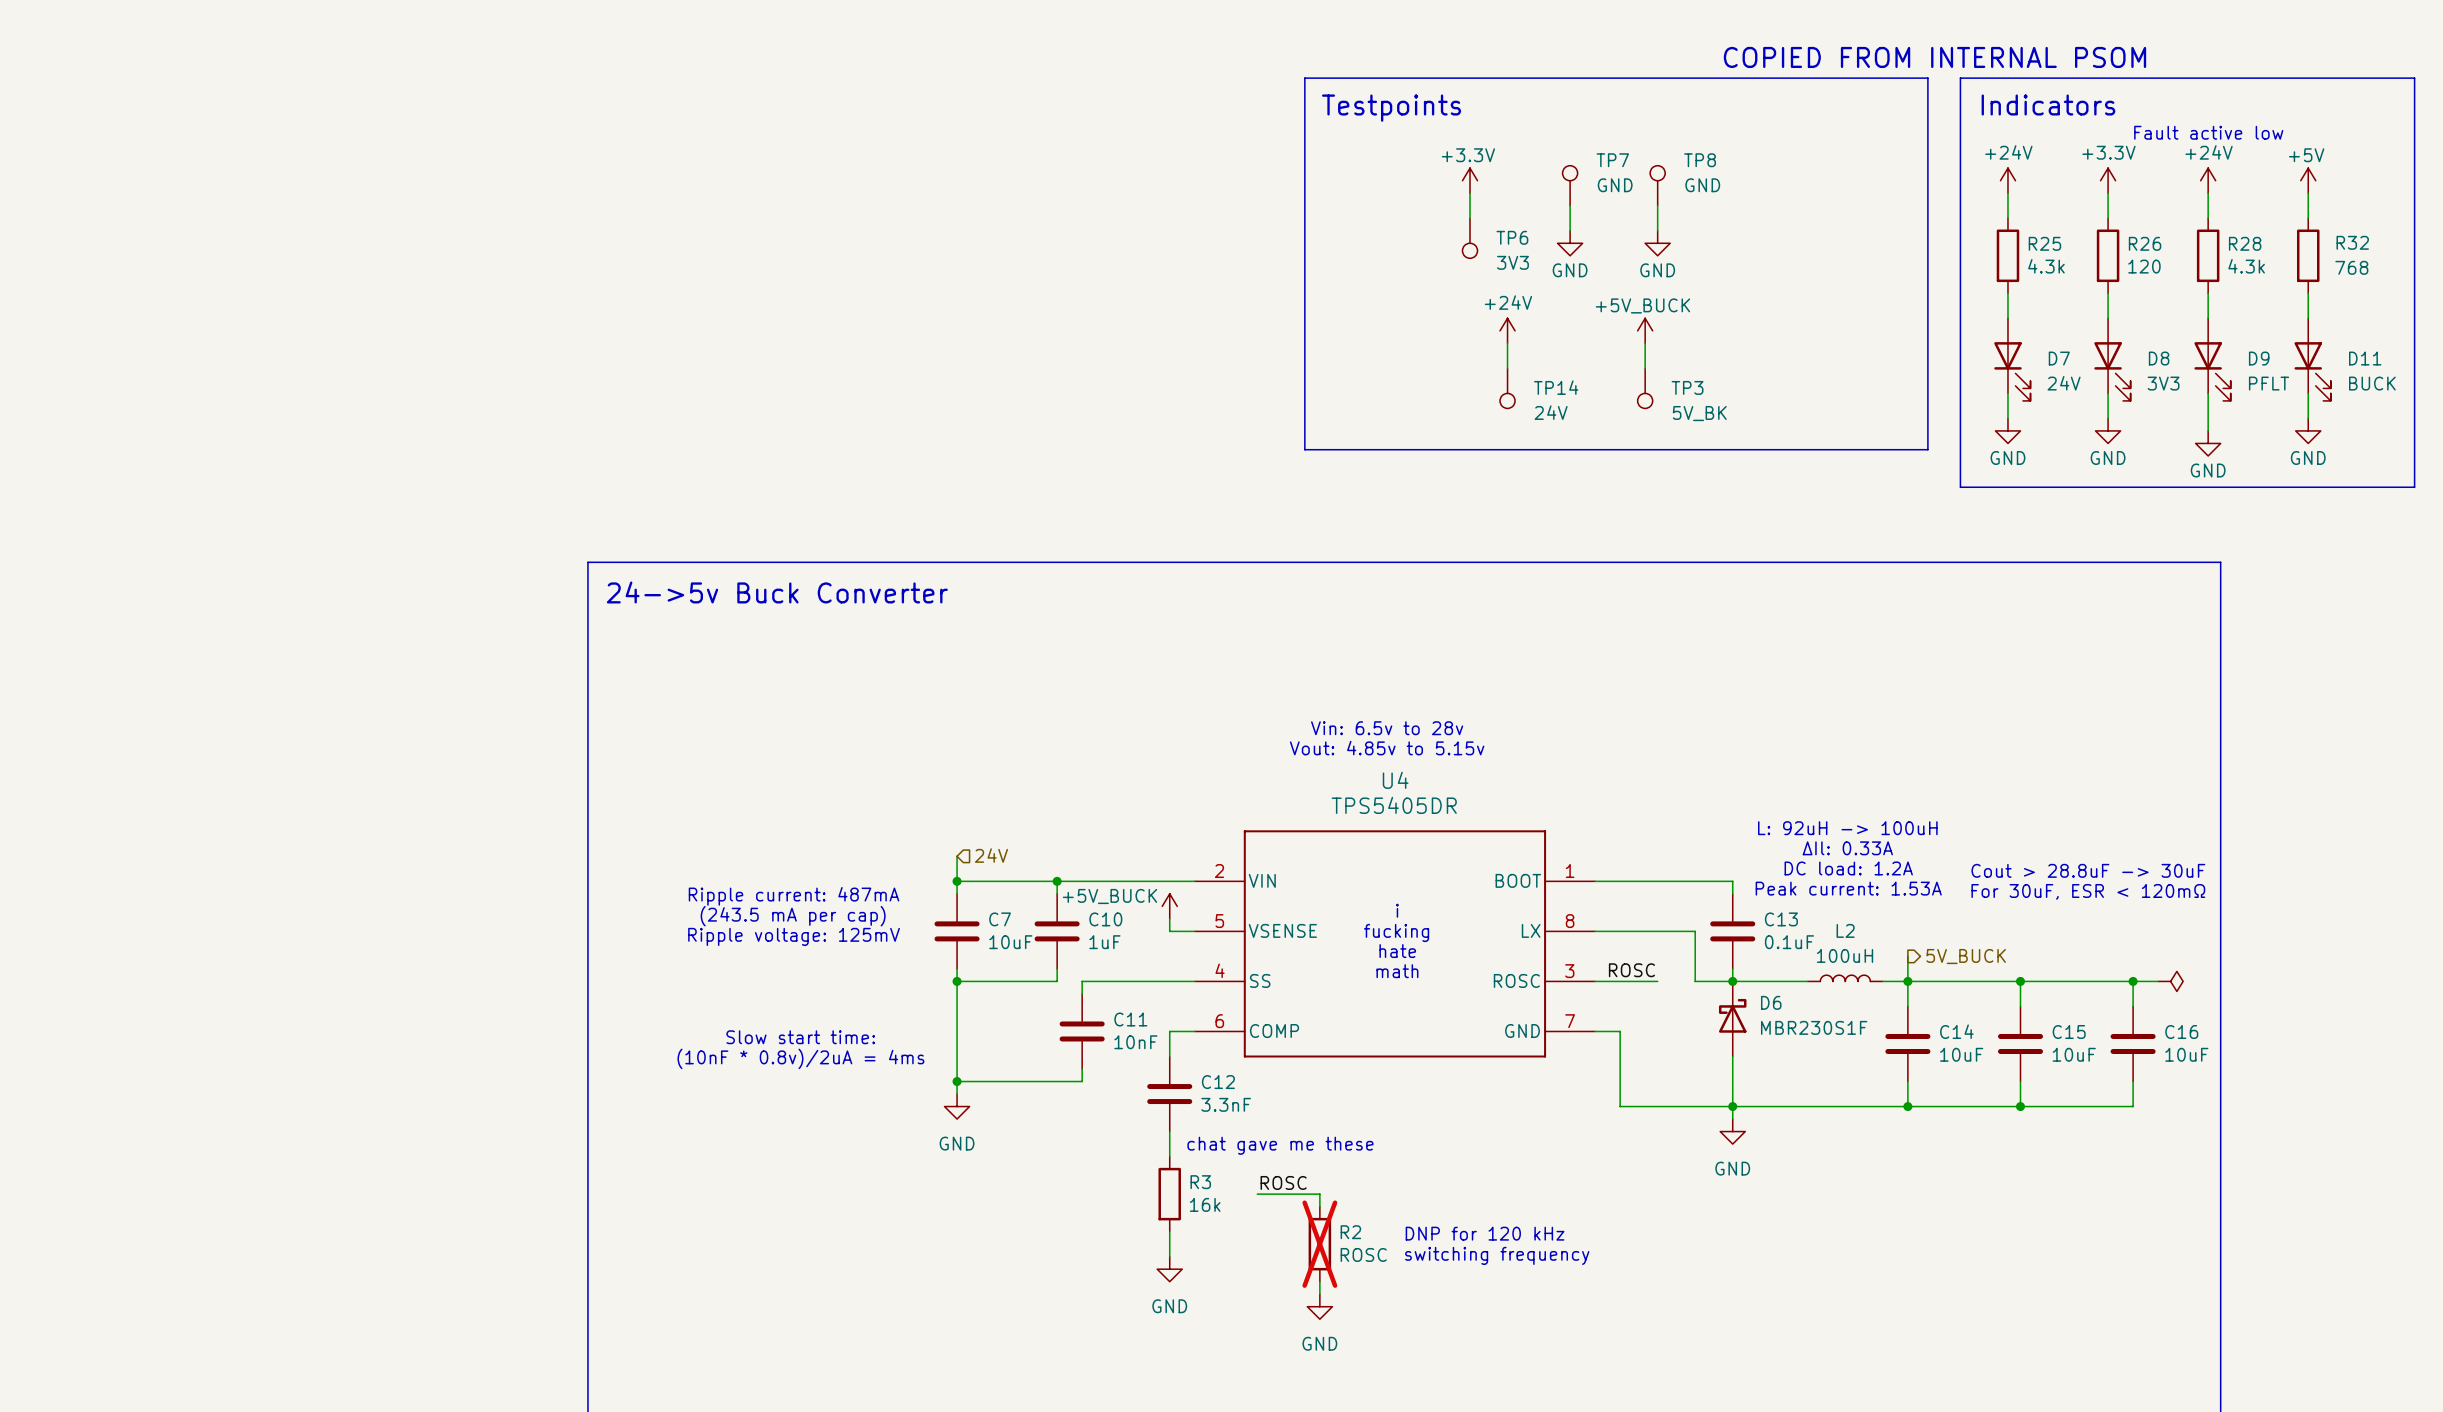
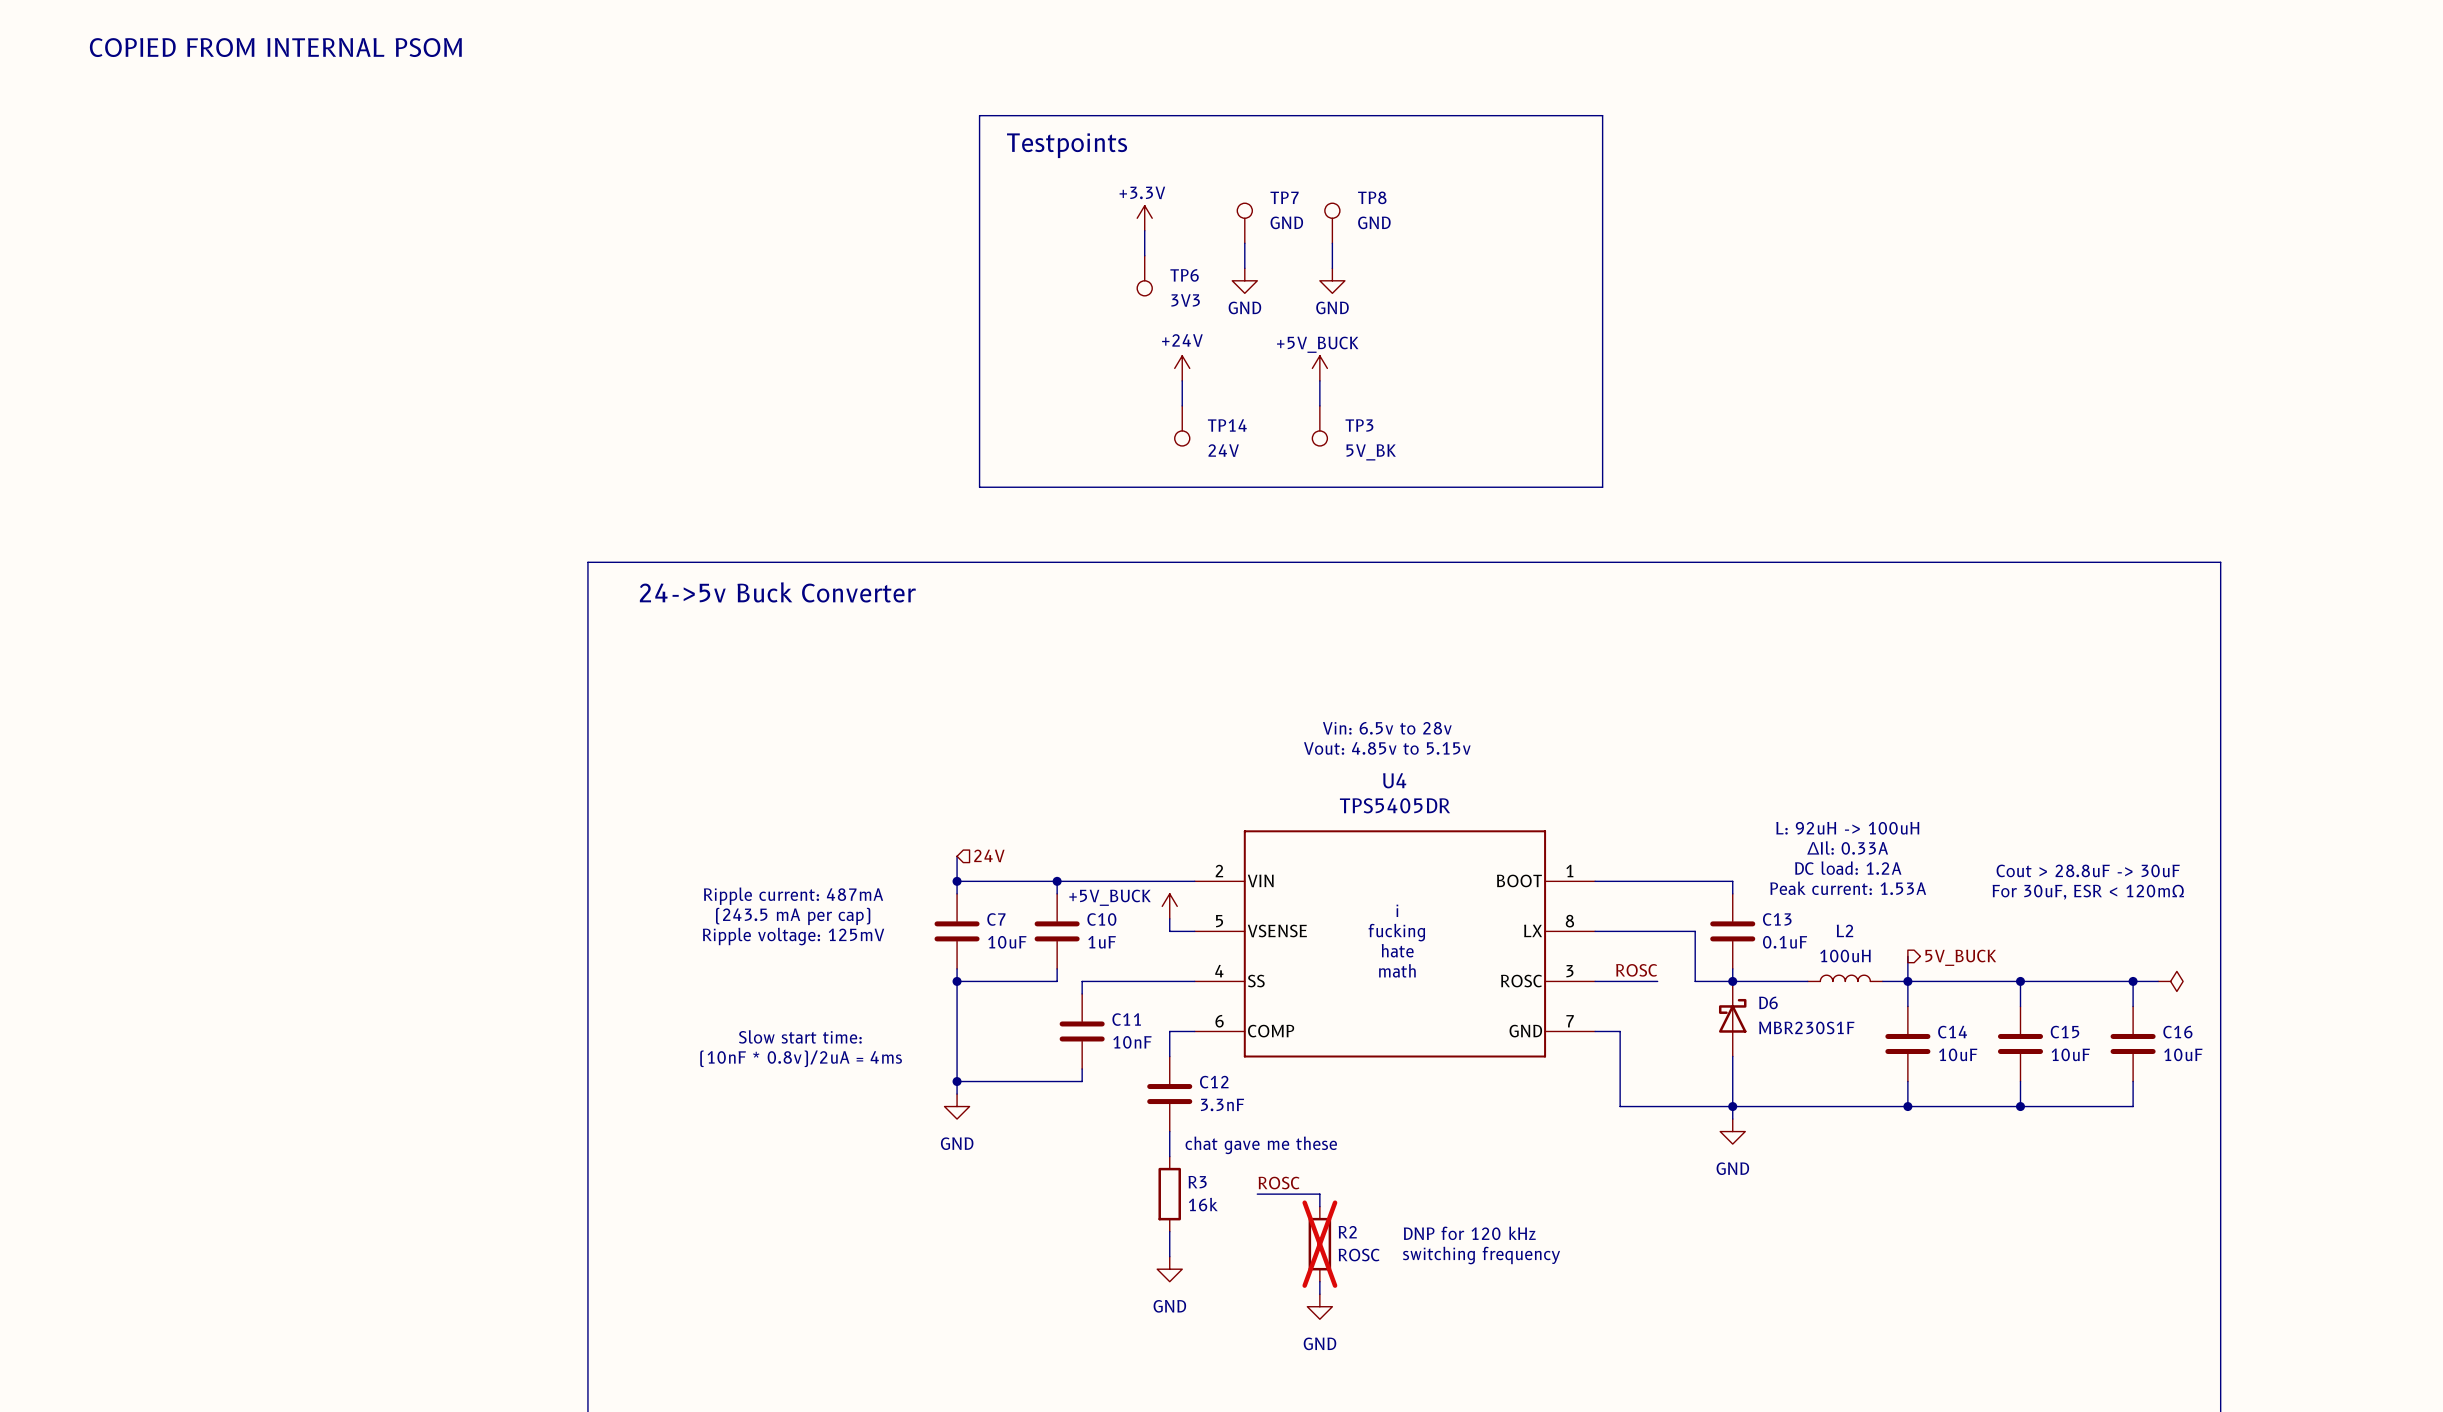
text: none -> COPIED FROM INTERNAL PSOM (275, 47)
text: COPIED FROM INTERNAL PSOM (1934, 57) -> none
line: (1304, 78) (1927, 78) (1927, 449) (1304, 449) (1304, 78) -> none
line: (1960, 78) (2414, 78) (2414, 487) (1960, 487) (1960, 78) -> none
text: Indicators (2048, 104) -> none
text: Testpoints (1391, 108) -> none
line: none -> (979, 115) (1602, 115) (1602, 487) (979, 487) (979, 115)
text: Fault active low (2208, 132) -> none
text: none -> Testpoints (1067, 145)
power symbol: +3.3V (1470, 180) -> none
power symbol: +24V (2007, 180) -> none
power symbol: +3.3V (2108, 180) -> none
power symbol: +24V (2208, 180) -> none
power symbol: +5V (2308, 180) -> none
TP7 position: (1570, 185) -> (1244, 223)
TP8 position: (1657, 185) -> (1332, 223)
wire: (1470, 193) (1470, 218) -> (1332, 243) (1332, 268)
wire: (2007, 193) (2007, 218) -> none
wire: (2108, 193) (2108, 218) -> none
wire: (2208, 193) (2208, 218) -> none
wire: (2308, 193) (2308, 218) -> none
wire: (1570, 205) (1570, 230) -> none
wire: (1657, 205) (1657, 230) -> none
power symbol: none -> +3.3V (1144, 218)
wire: none -> (1144, 230) (1144, 255)
TP6 position: (1470, 238) -> (1144, 275)
wire: none -> (1244, 243) (1244, 268)
power symbol: GND (1570, 243) -> none
power symbol: GND (1657, 243) -> none
R25: 4.3k (2007, 255) -> none
R26: 120 (2108, 255) -> none
R28: 4.3k (2208, 255) -> none
R32: 768 (2308, 255) -> none
power symbol: none -> GND (1244, 280)
power symbol: none -> GND (1332, 280)
wire: (2007, 293) (2007, 318) -> none
wire: (2108, 293) (2108, 318) -> none
wire: (2208, 293) (2208, 318) -> none
wire: (2308, 293) (2308, 318) -> none
power symbol: +24V (1507, 330) -> none
power symbol: +5V_BUCK (1645, 330) -> none
wire: (1507, 343) (1507, 368) -> (1319, 380) (1319, 405)
wire: (1645, 343) (1645, 368) -> none
D7: 24V (2012, 359) -> none
D8: 3V3 (2112, 359) -> none
D9: PFLT (2212, 359) -> none
D11: BUCK (2312, 359) -> none
power symbol: none -> +24V (1182, 368)
power symbol: none -> +5V_BUCK (1319, 368)
wire: none -> (1182, 380) (1182, 405)
TP14 position: (1507, 388) -> (1182, 425)
TP3 position: (1645, 388) -> (1319, 425)
wire: (2007, 393) (2007, 418) -> none
wire: (2108, 393) (2108, 418) -> none
wire: (2208, 393) (2208, 430) -> none
wire: (2308, 393) (2308, 418) -> none
power symbol: GND (2007, 430) -> none
power symbol: GND (2108, 430) -> none
power symbol: GND (2308, 430) -> none
power symbol: GND (2208, 443) -> none

